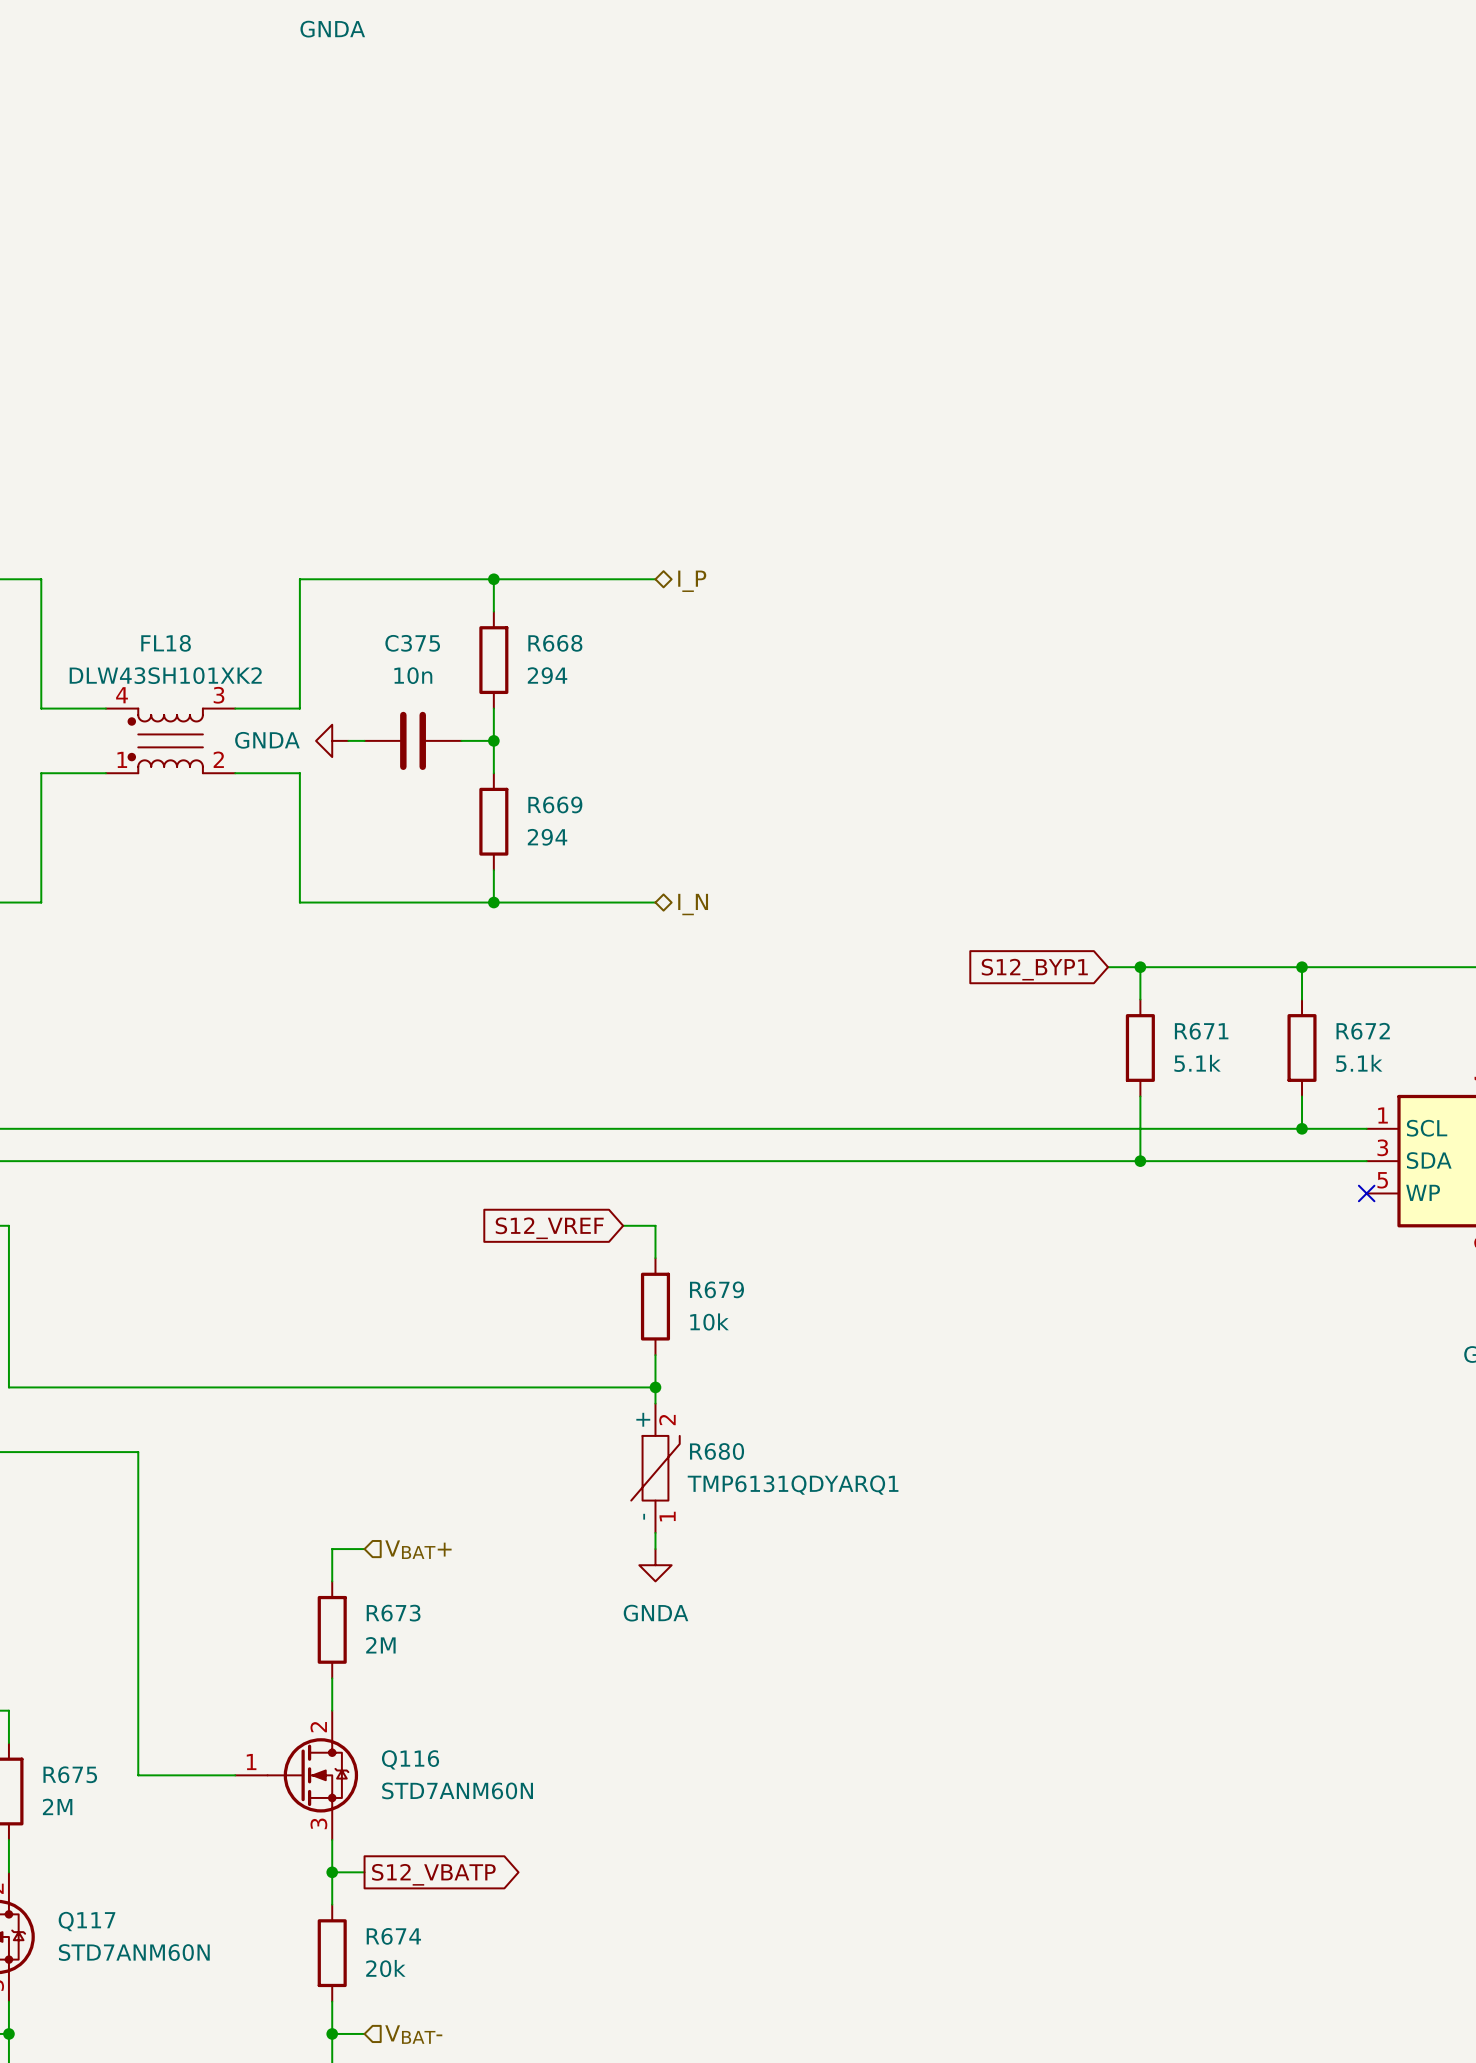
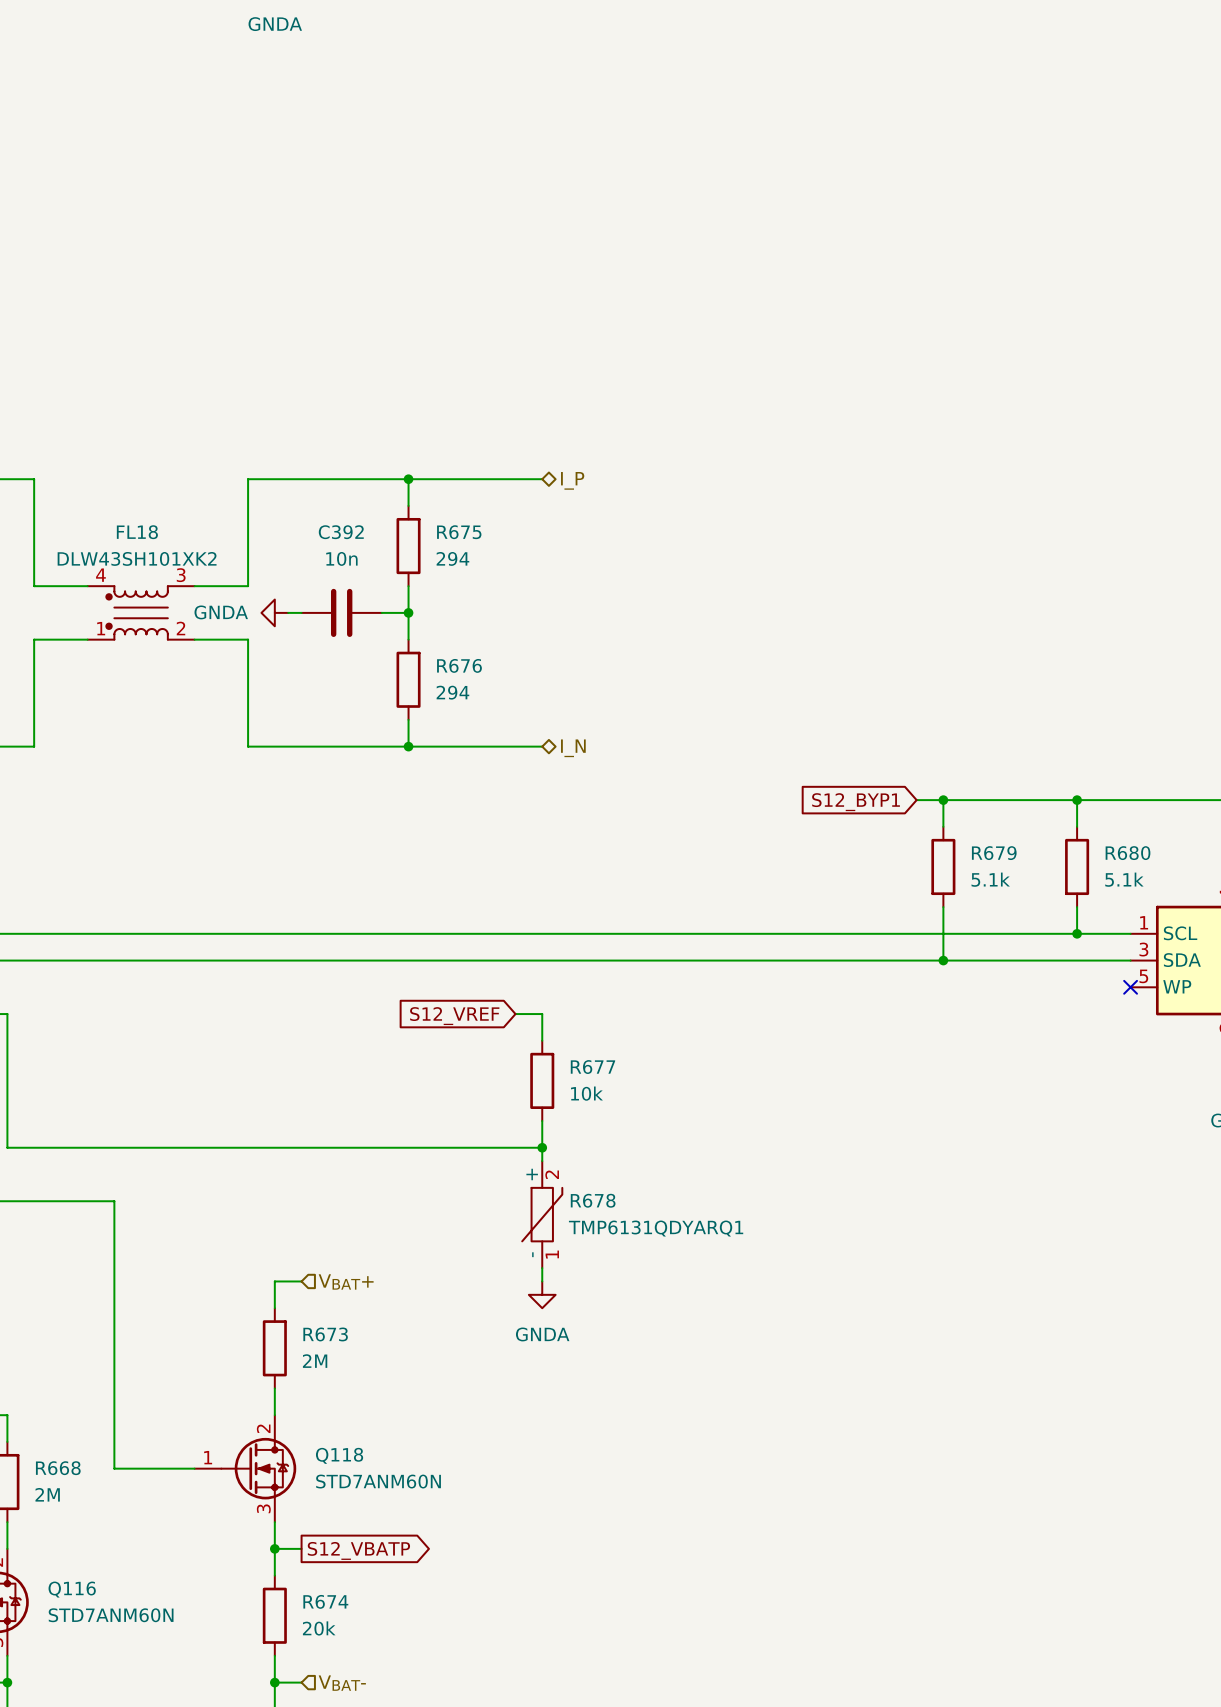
C375 name: C375 (412, 643) -> C392 (341, 532)
R668 name: R668 (555, 643) -> R675 (459, 532)
R669 name: R669 (555, 804) -> R676 (459, 665)
R671 name: R671 (1201, 1031) -> R679 (994, 853)
R672 name: R672 (1363, 1031) -> R680 (1128, 853)
R679 name: R679 (716, 1289) -> R677 (592, 1067)
R680 name: R680 (717, 1451) -> R678 (593, 1200)
Q116 name: Q116 (410, 1759) -> Q118 (339, 1455)
R675 name: R675 (70, 1774) -> R668 (58, 1468)
Q117 name: Q117 (87, 1921) -> Q116 (72, 1589)

